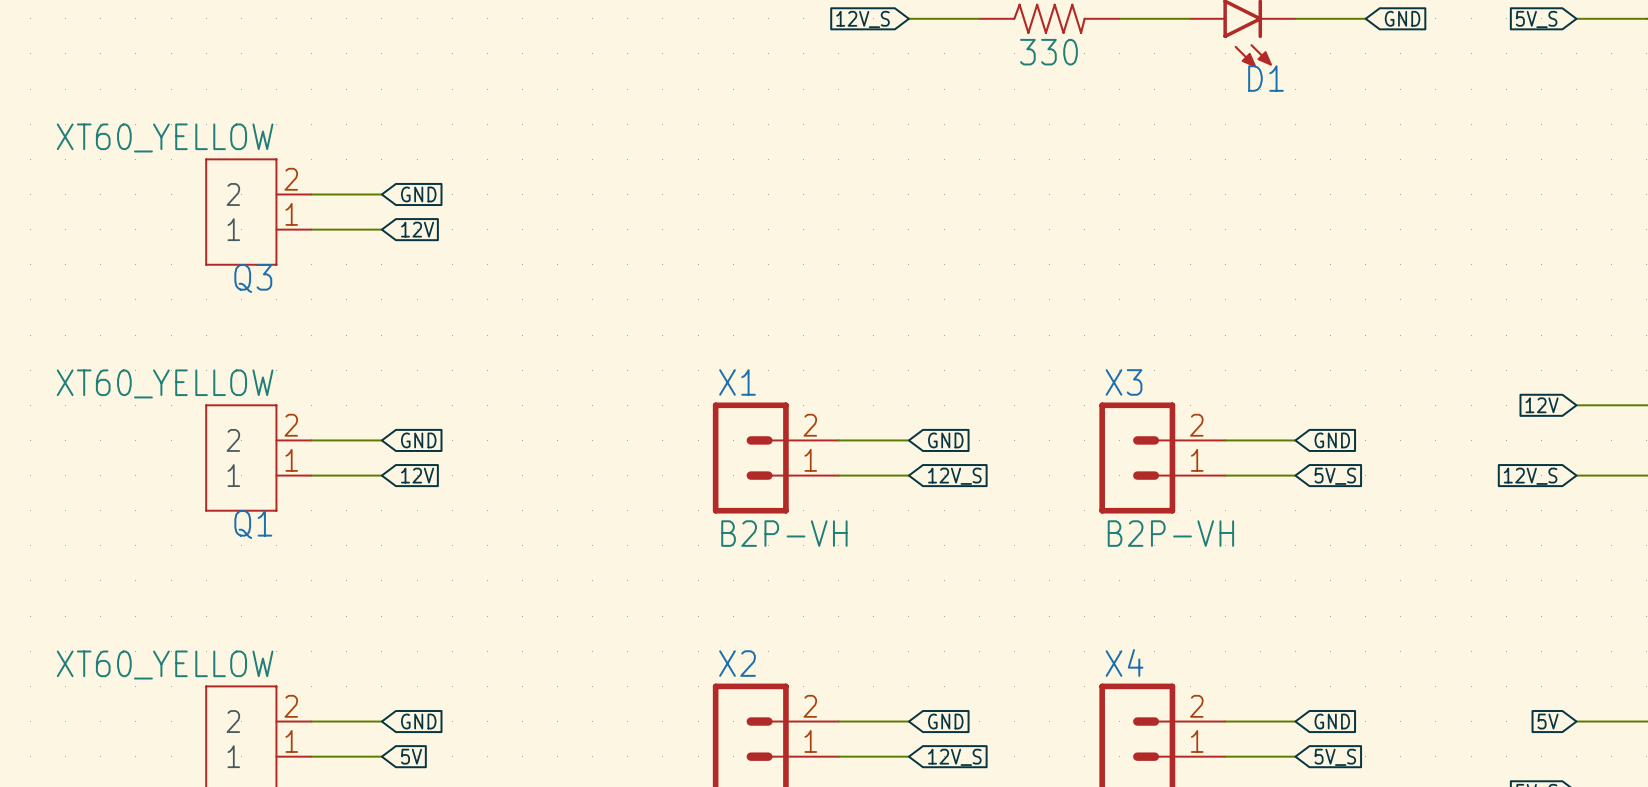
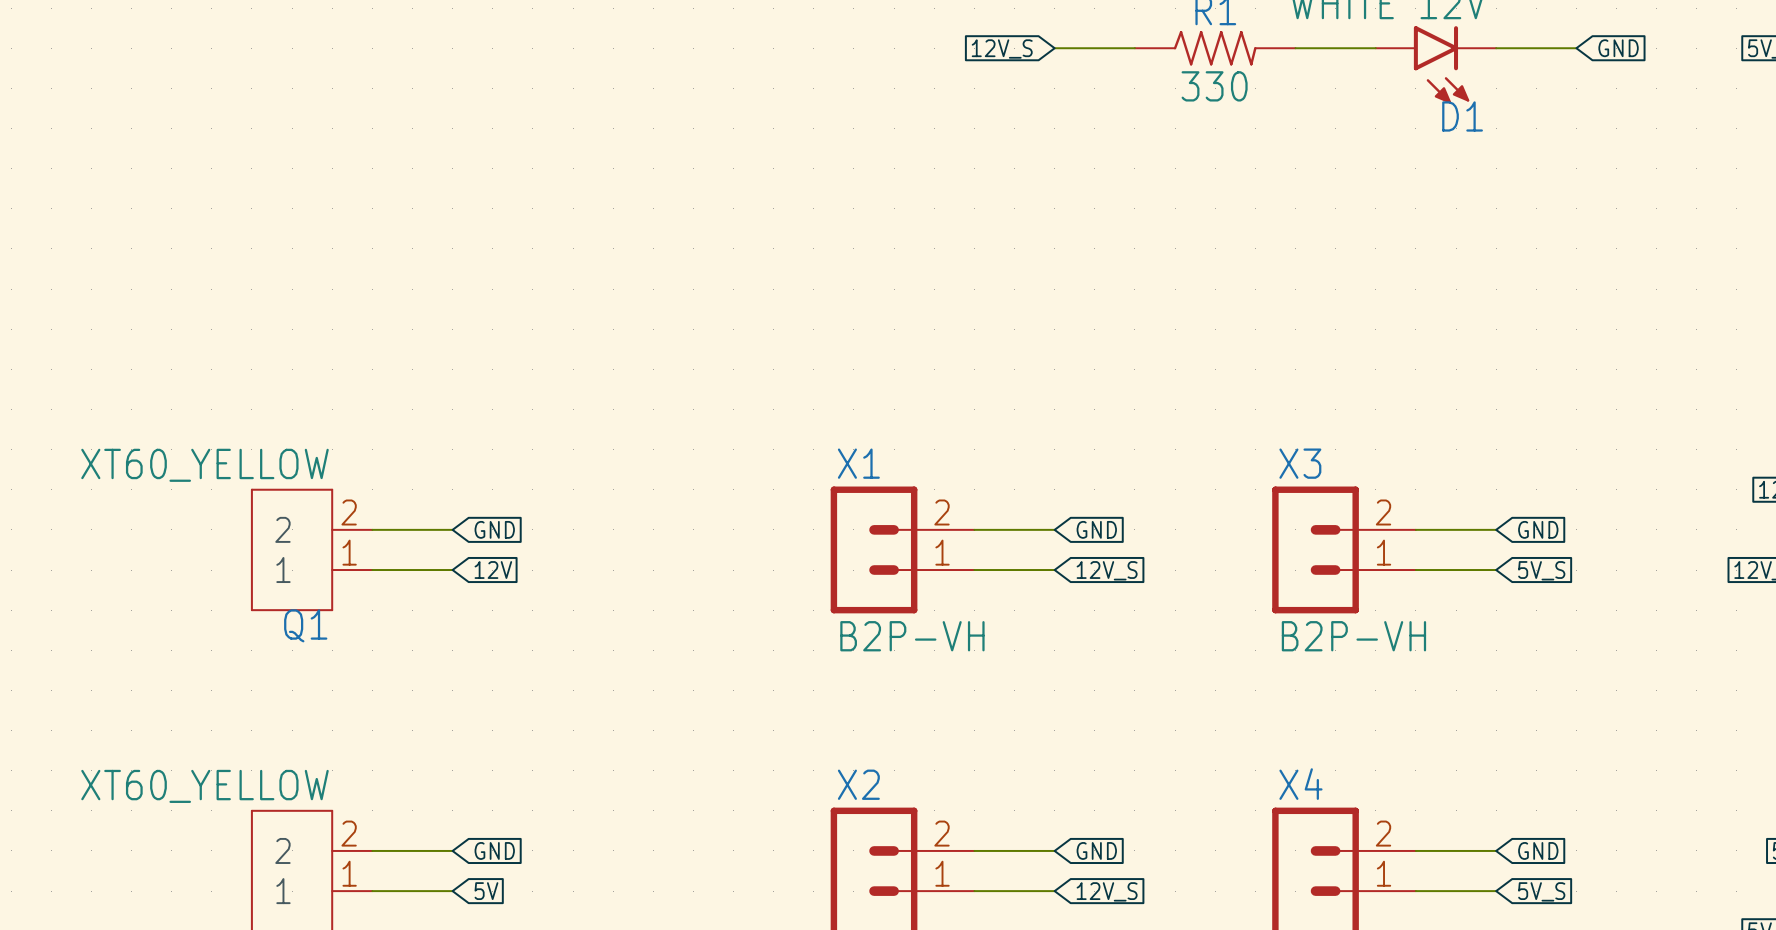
wire: (311, 194) (381, 194) -> none
global label: GND (418, 194) -> none
Q3: XT60_YELLOW (258, 212) -> none
wire: (311, 229) (381, 229) -> none
global label: 12V (417, 229) -> none

